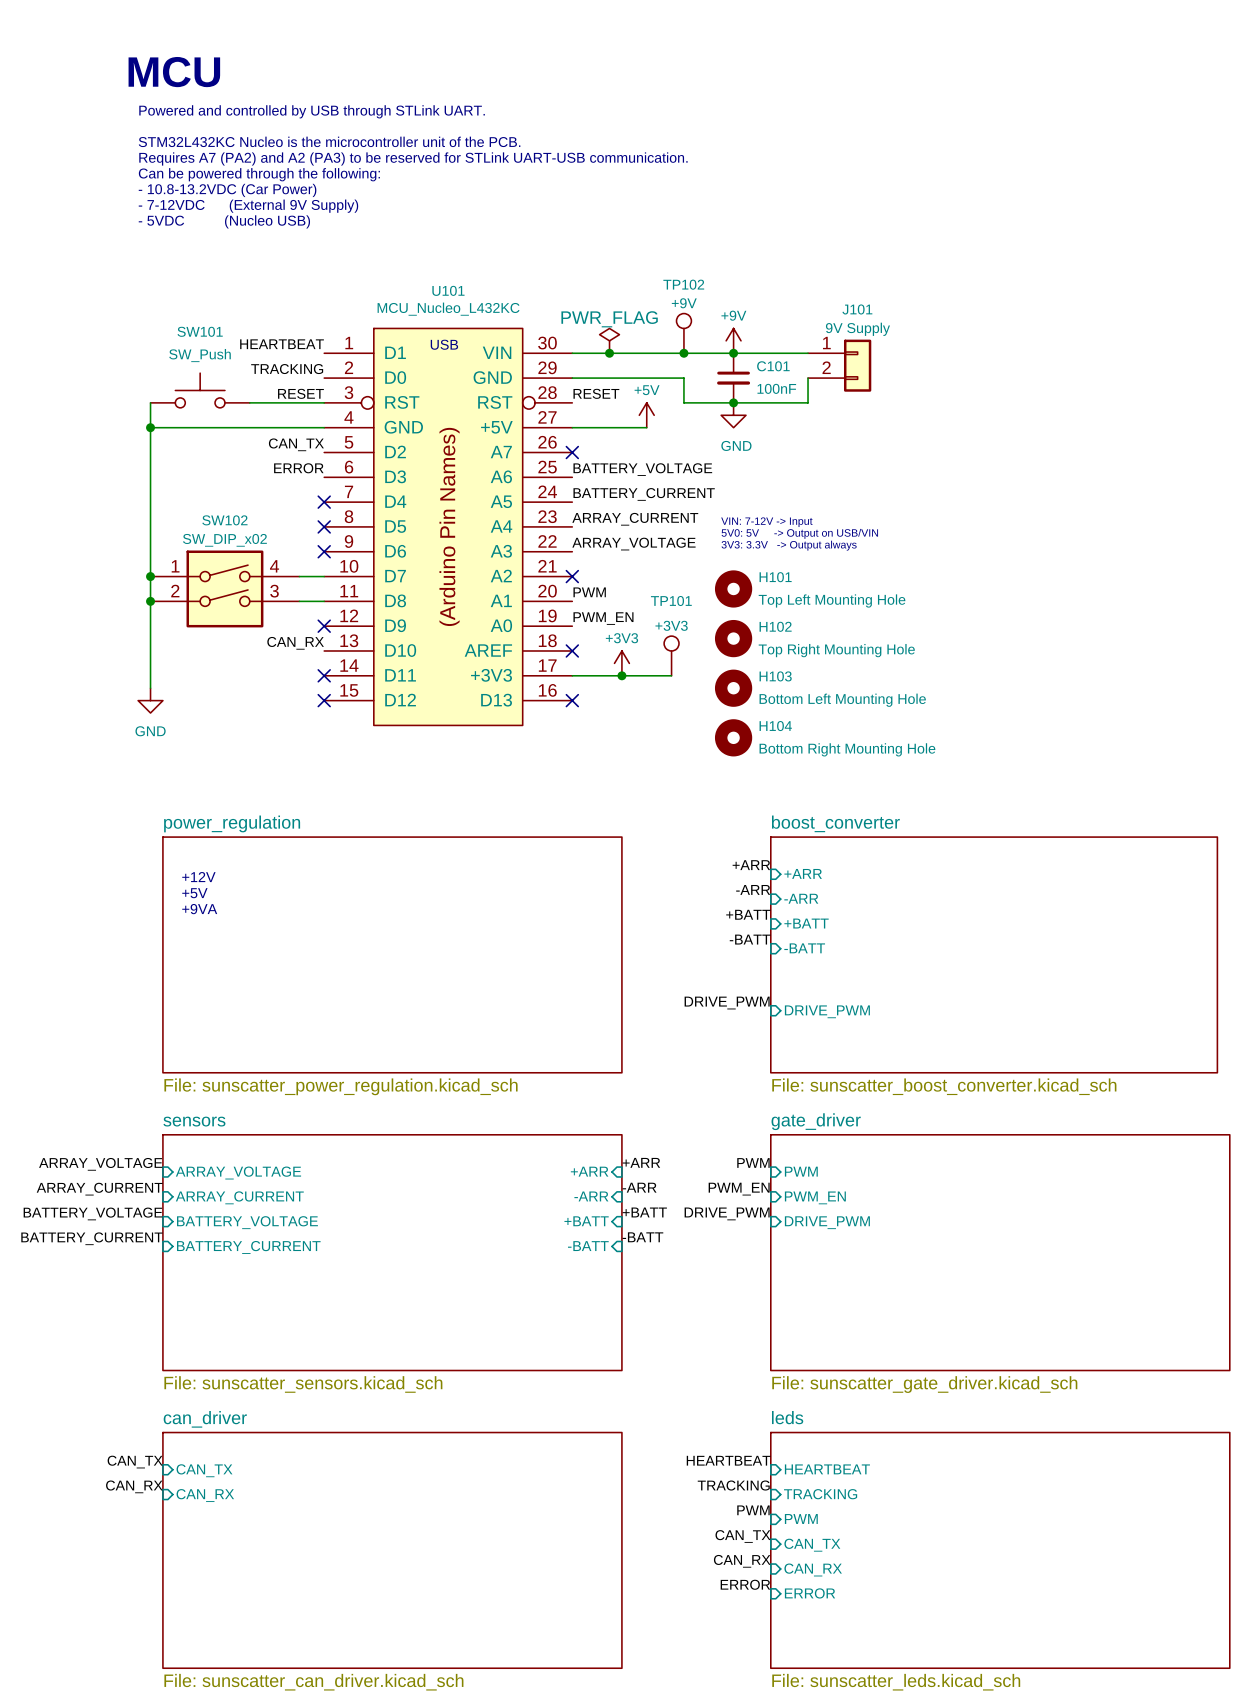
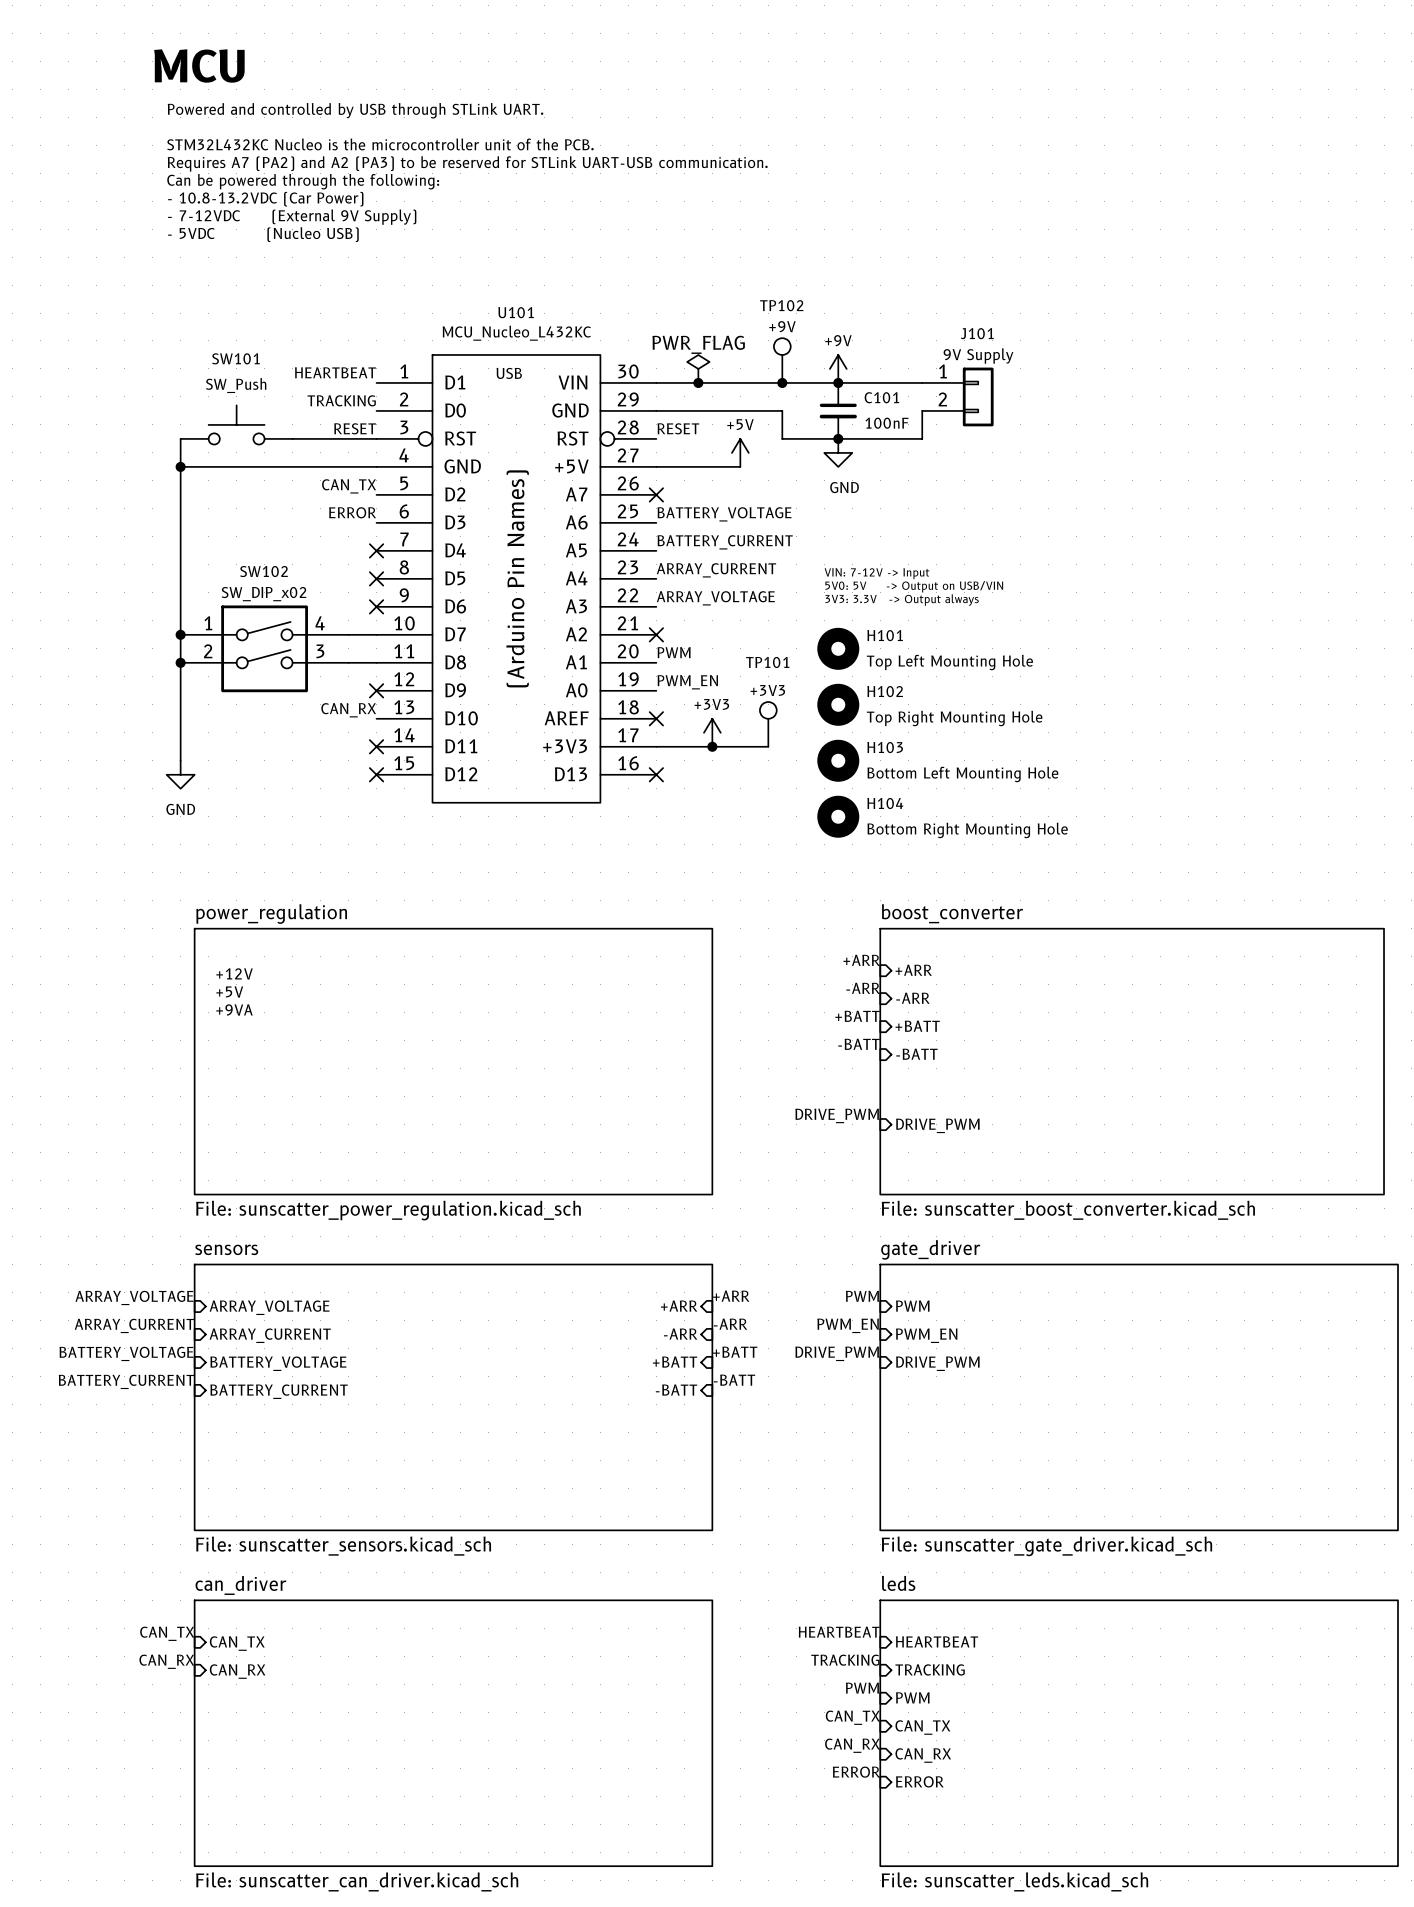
U101 symbol: [324, 328, 573, 726] -> [376, 354, 657, 803]

